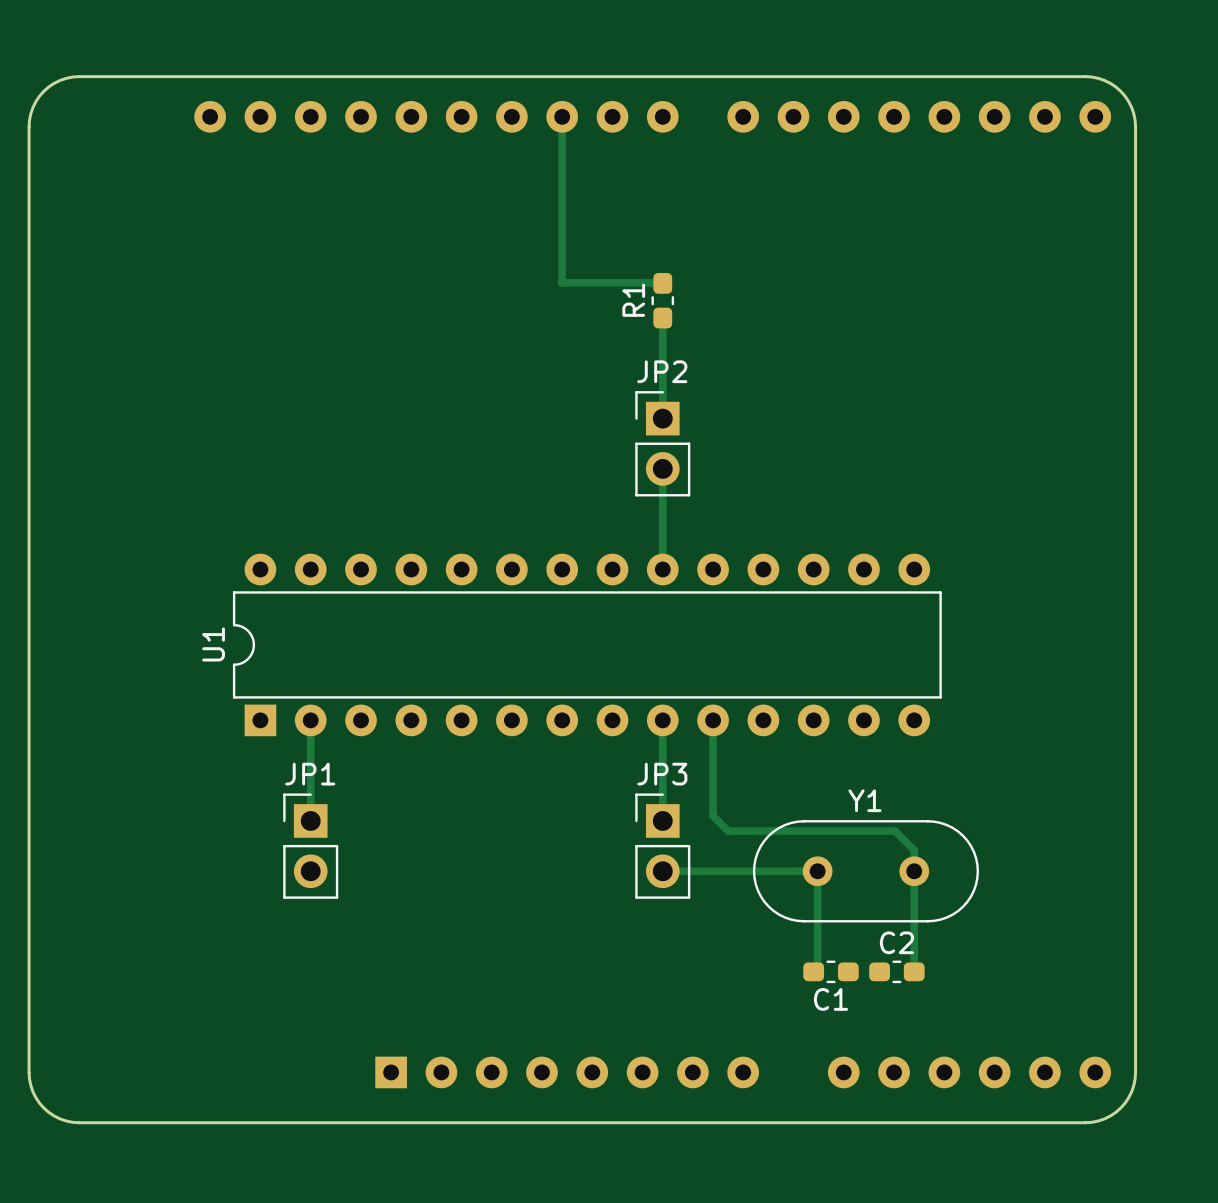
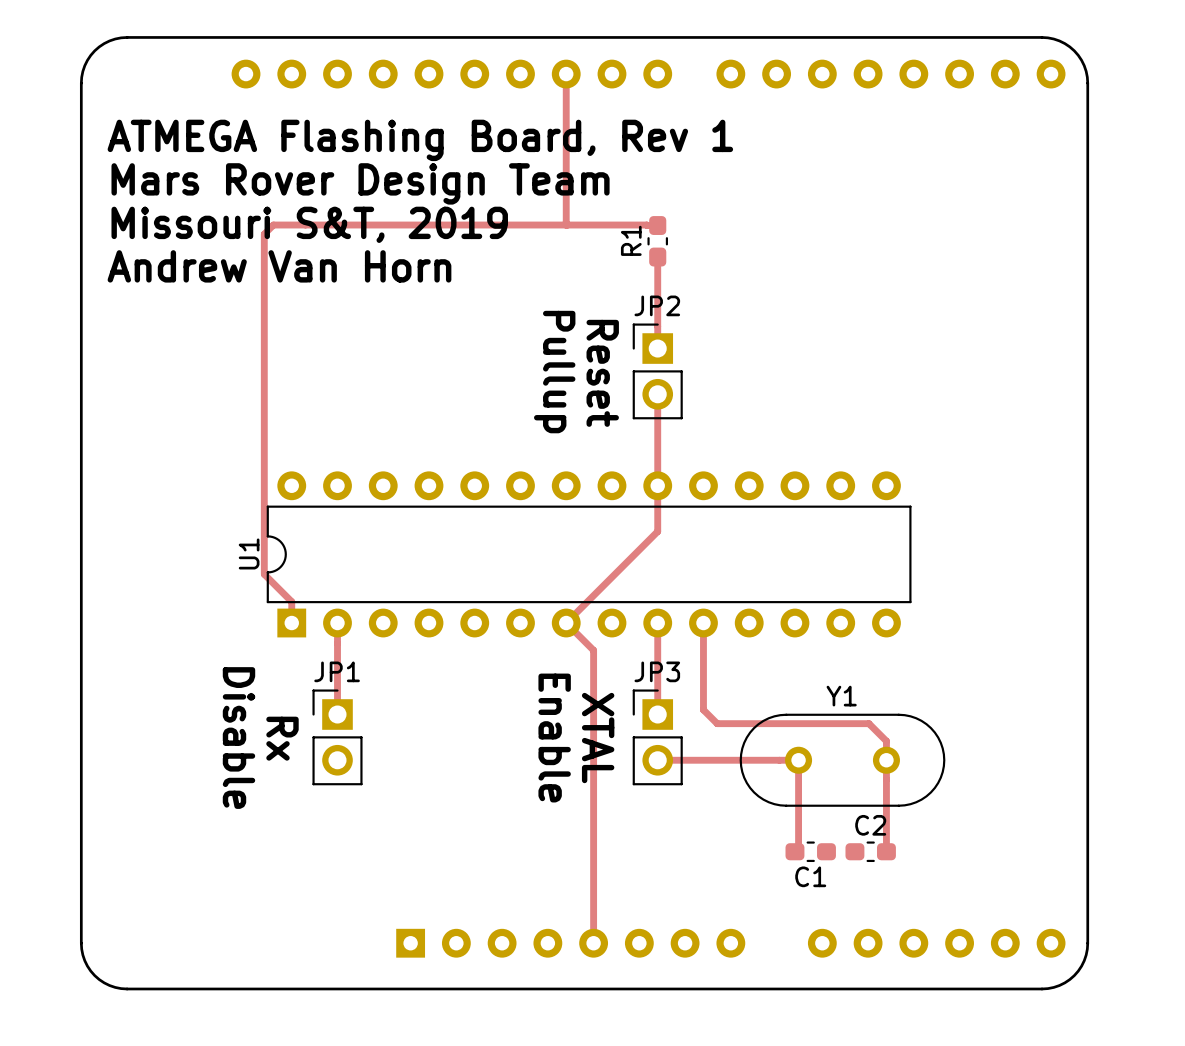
text: none -> ATMEGA Flashing Board, Rev 1 (420, 140)
text: none -> Mars Rover Design Team (360, 183)
text: none -> Missouri S&T, 2019 (309, 224)
track: none -> (566, 225) (273, 225) (264, 234) (264, 574) (291, 601) (291, 623)
text: none -> Andrew Van Horn (279, 266)
text: none -> Pullup (554, 372)
text: none -> Reset (602, 373)
track: none -> (657, 485) (657, 531) (566, 623) (593, 650) (593, 943)
text: none -> Disable (238, 738)
text: none -> Enable (554, 738)
text: none -> XTAL (598, 738)
text: none -> Rx (282, 738)

